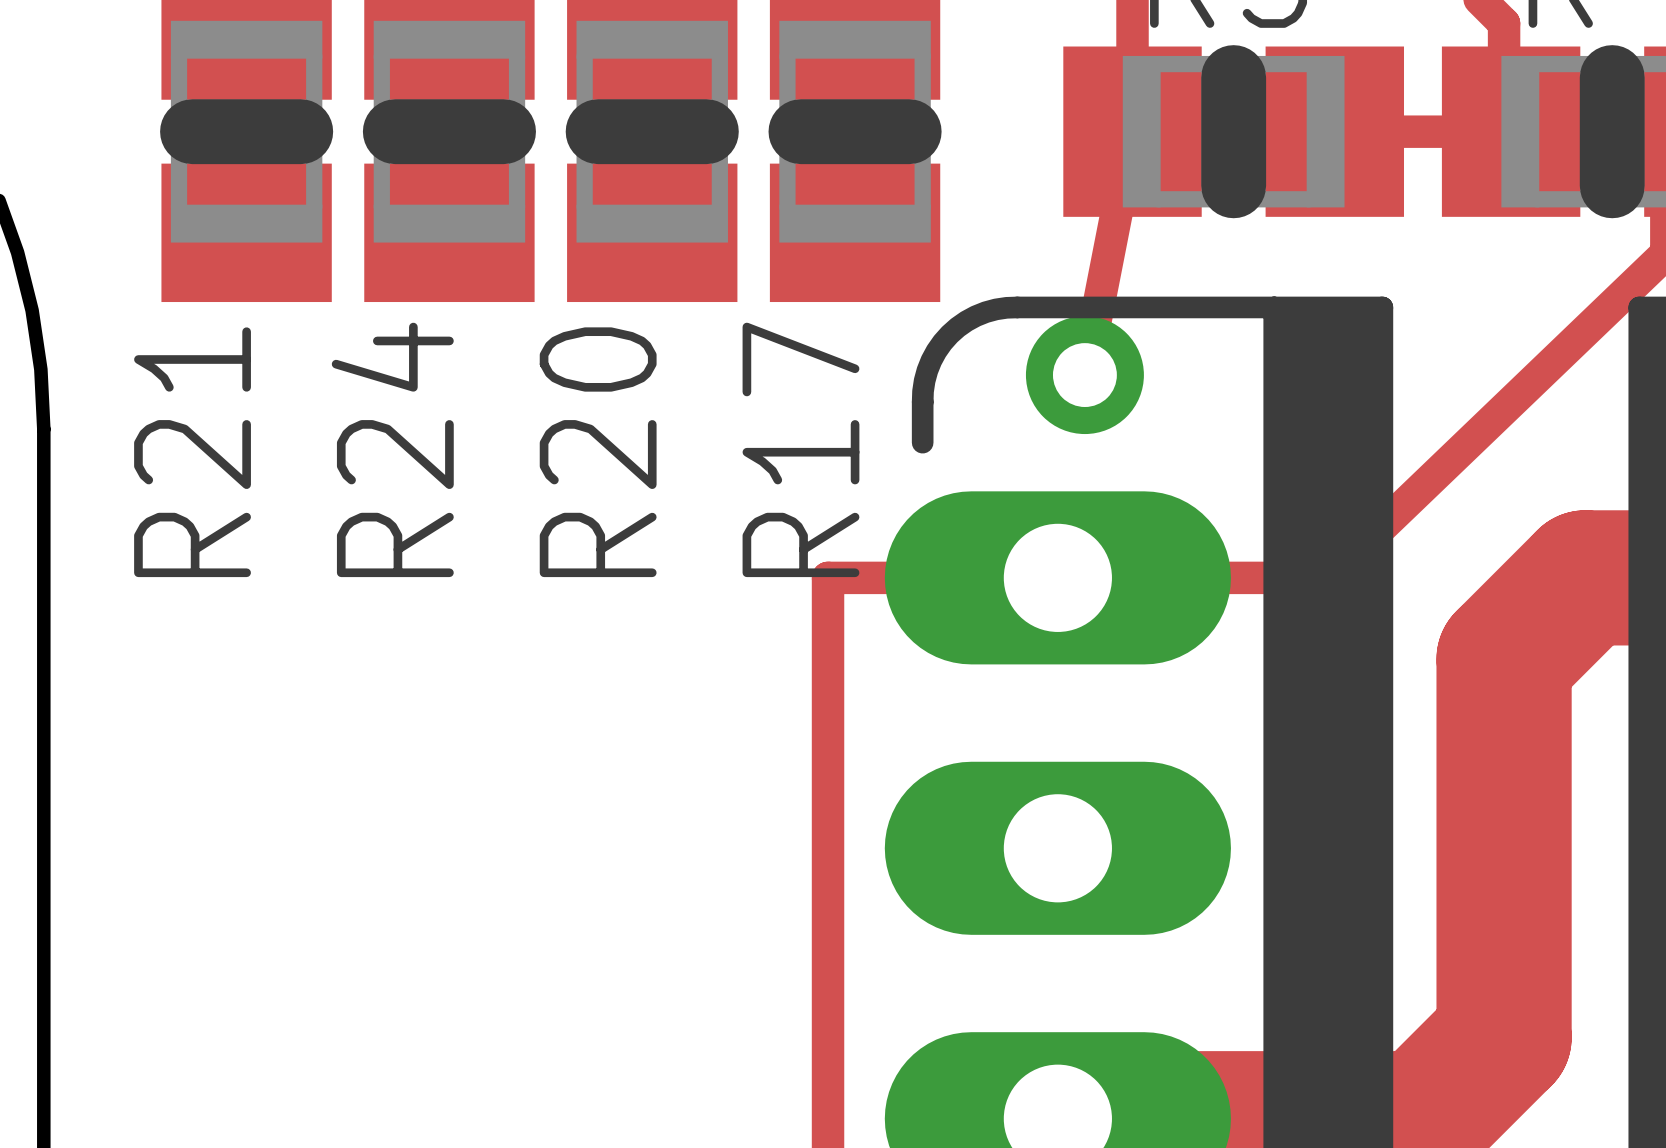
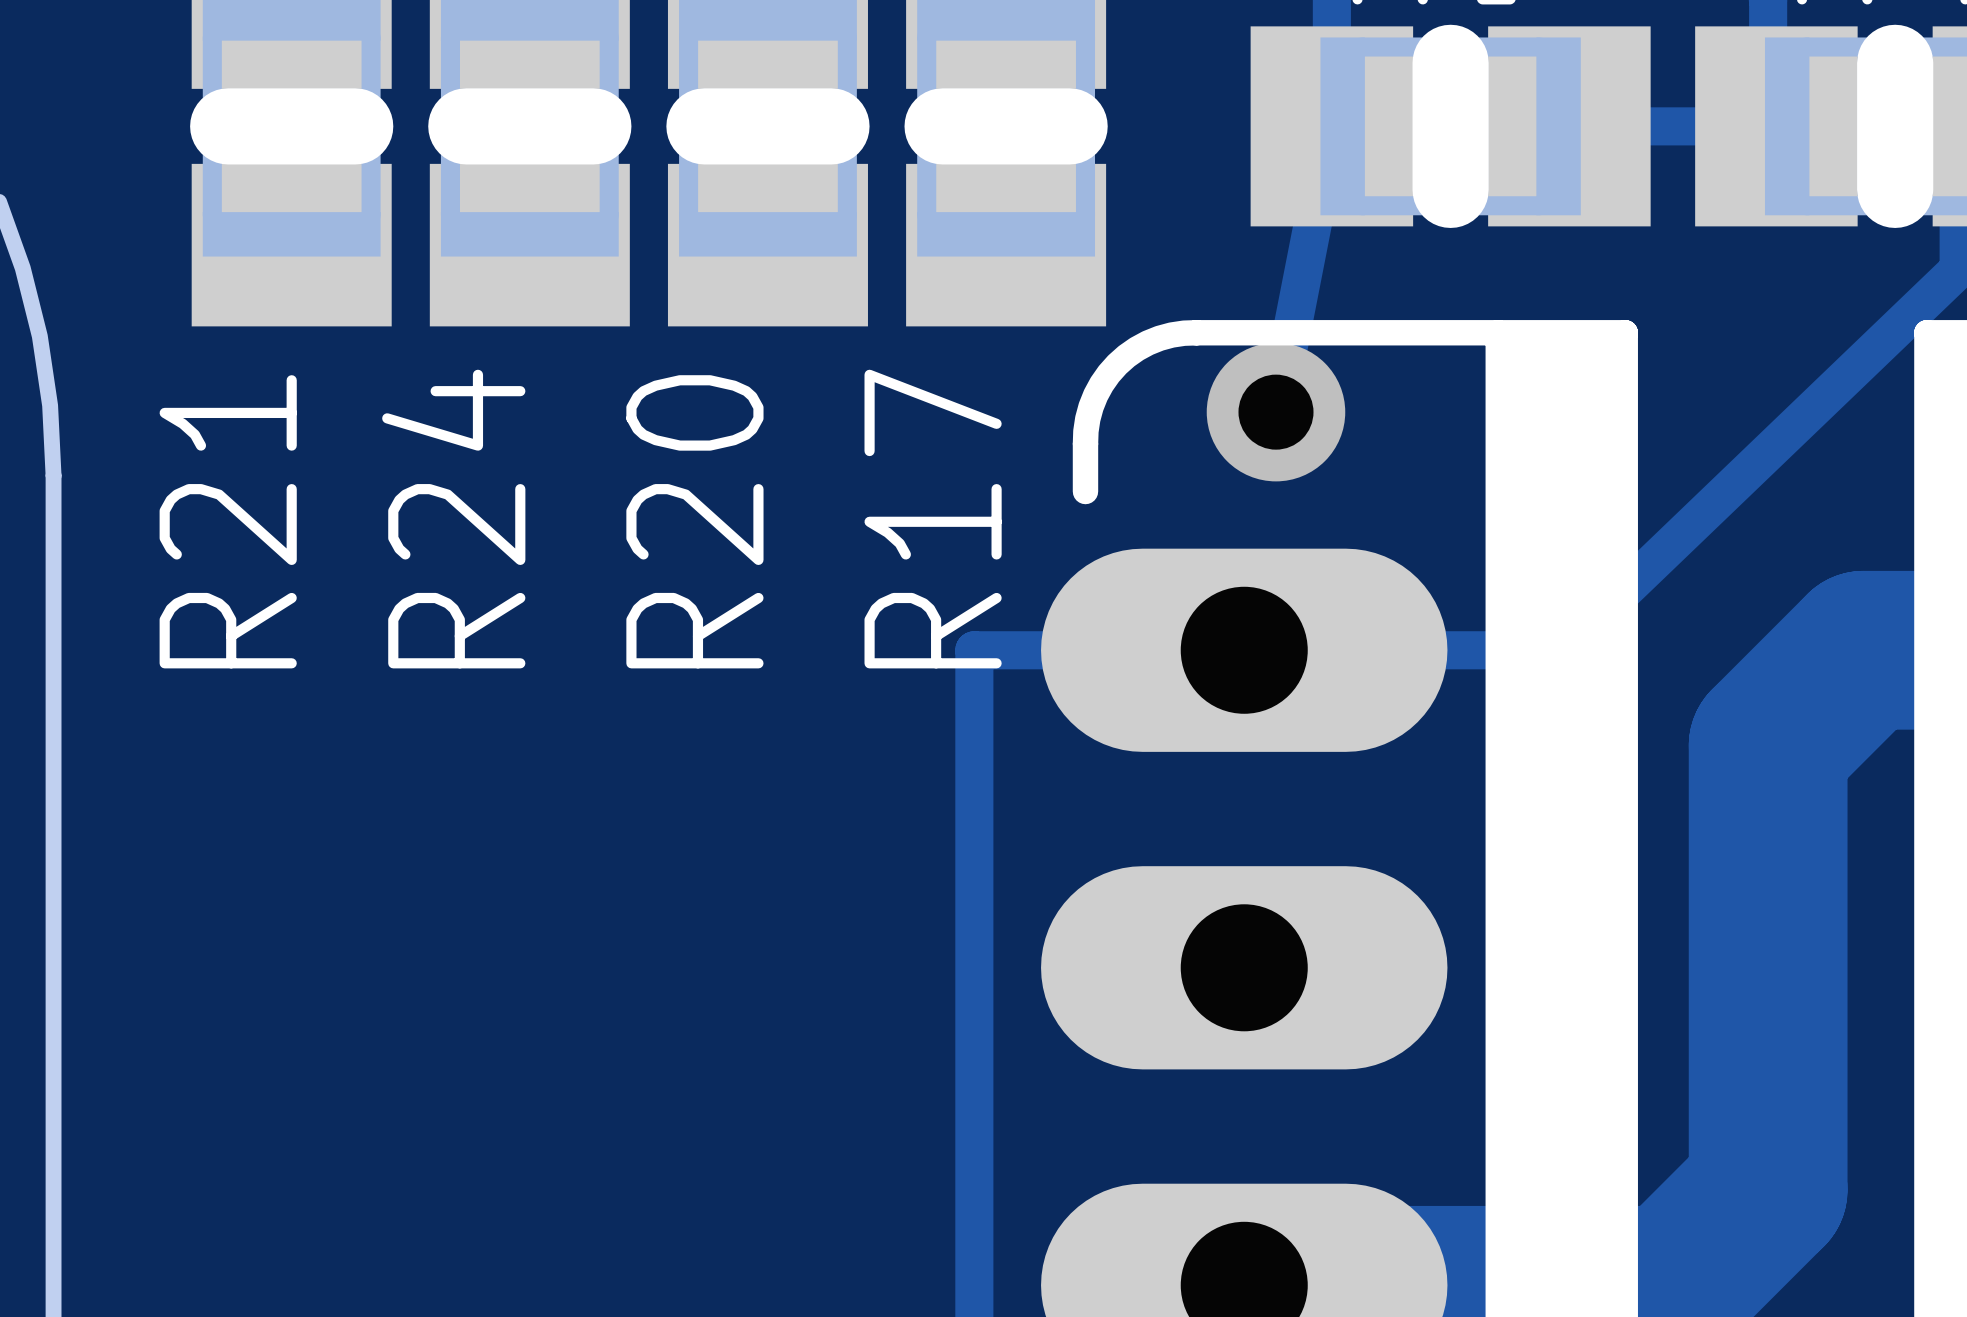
R24 name position: R24 (392, 449) -> R24 (453, 519)
R17 name position: R17 (800, 449) -> R17 (933, 519)
R21 name position: R21 (192, 452) -> R21 (228, 521)
R20 name position: R20 (598, 452) -> R20 (694, 521)

